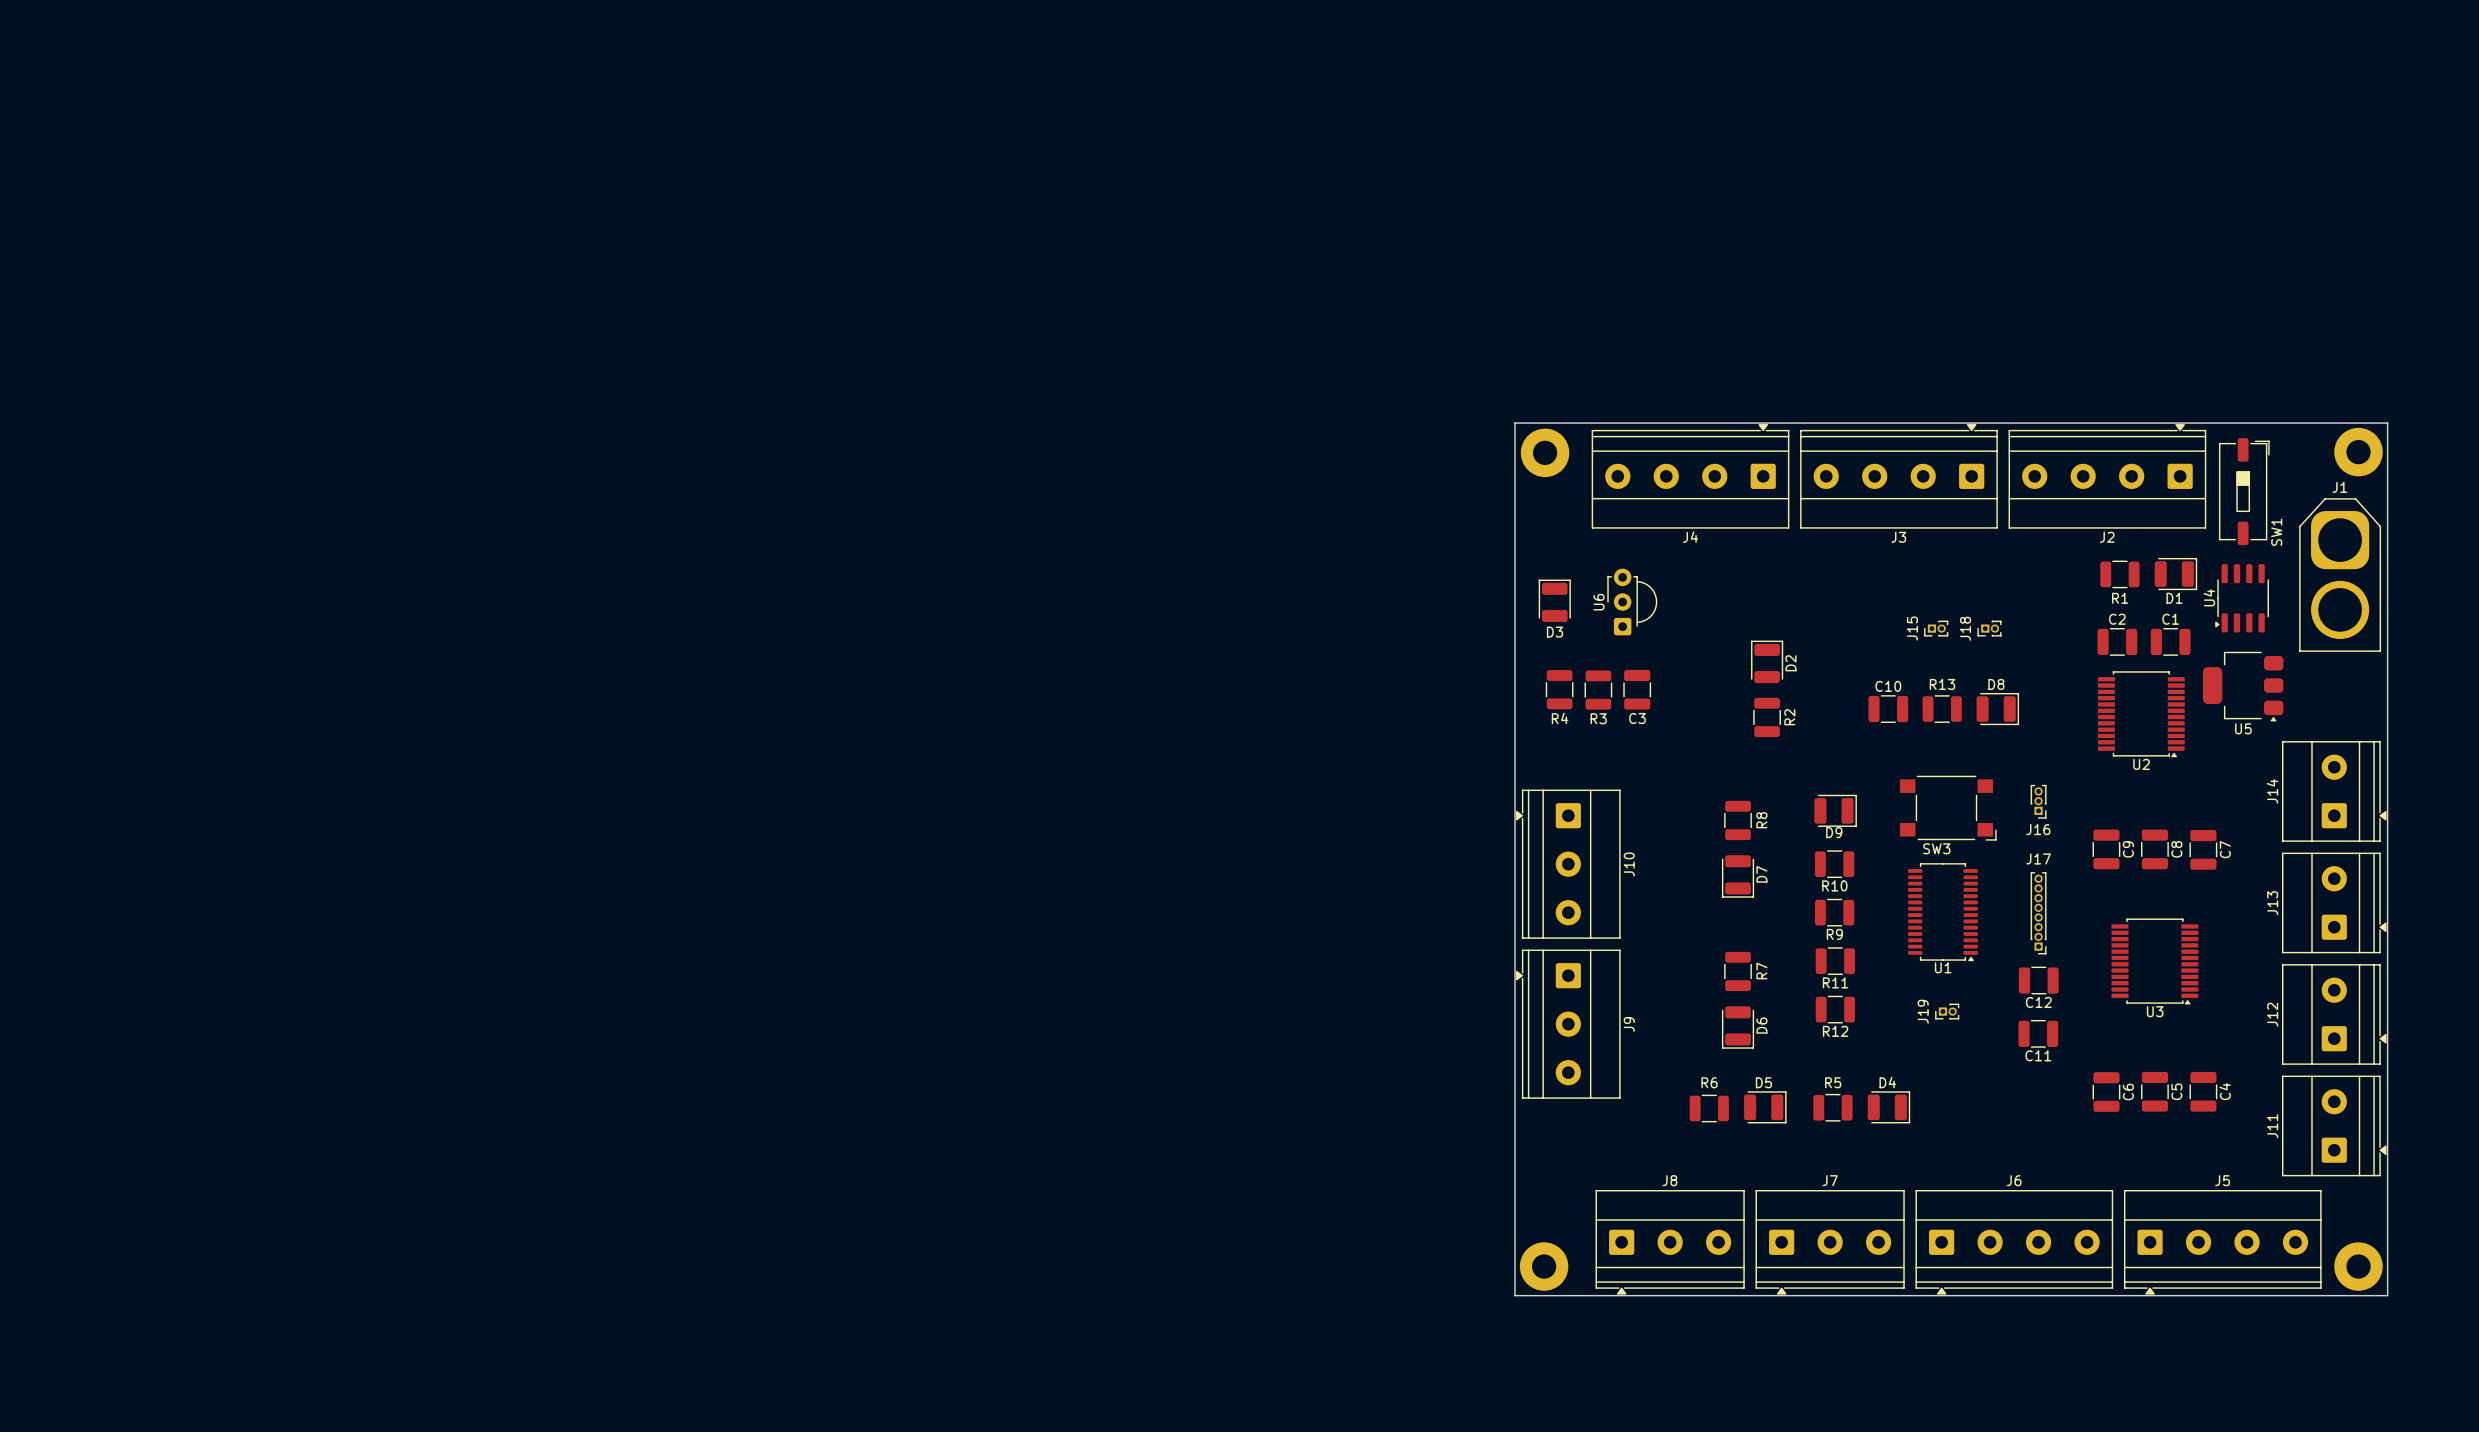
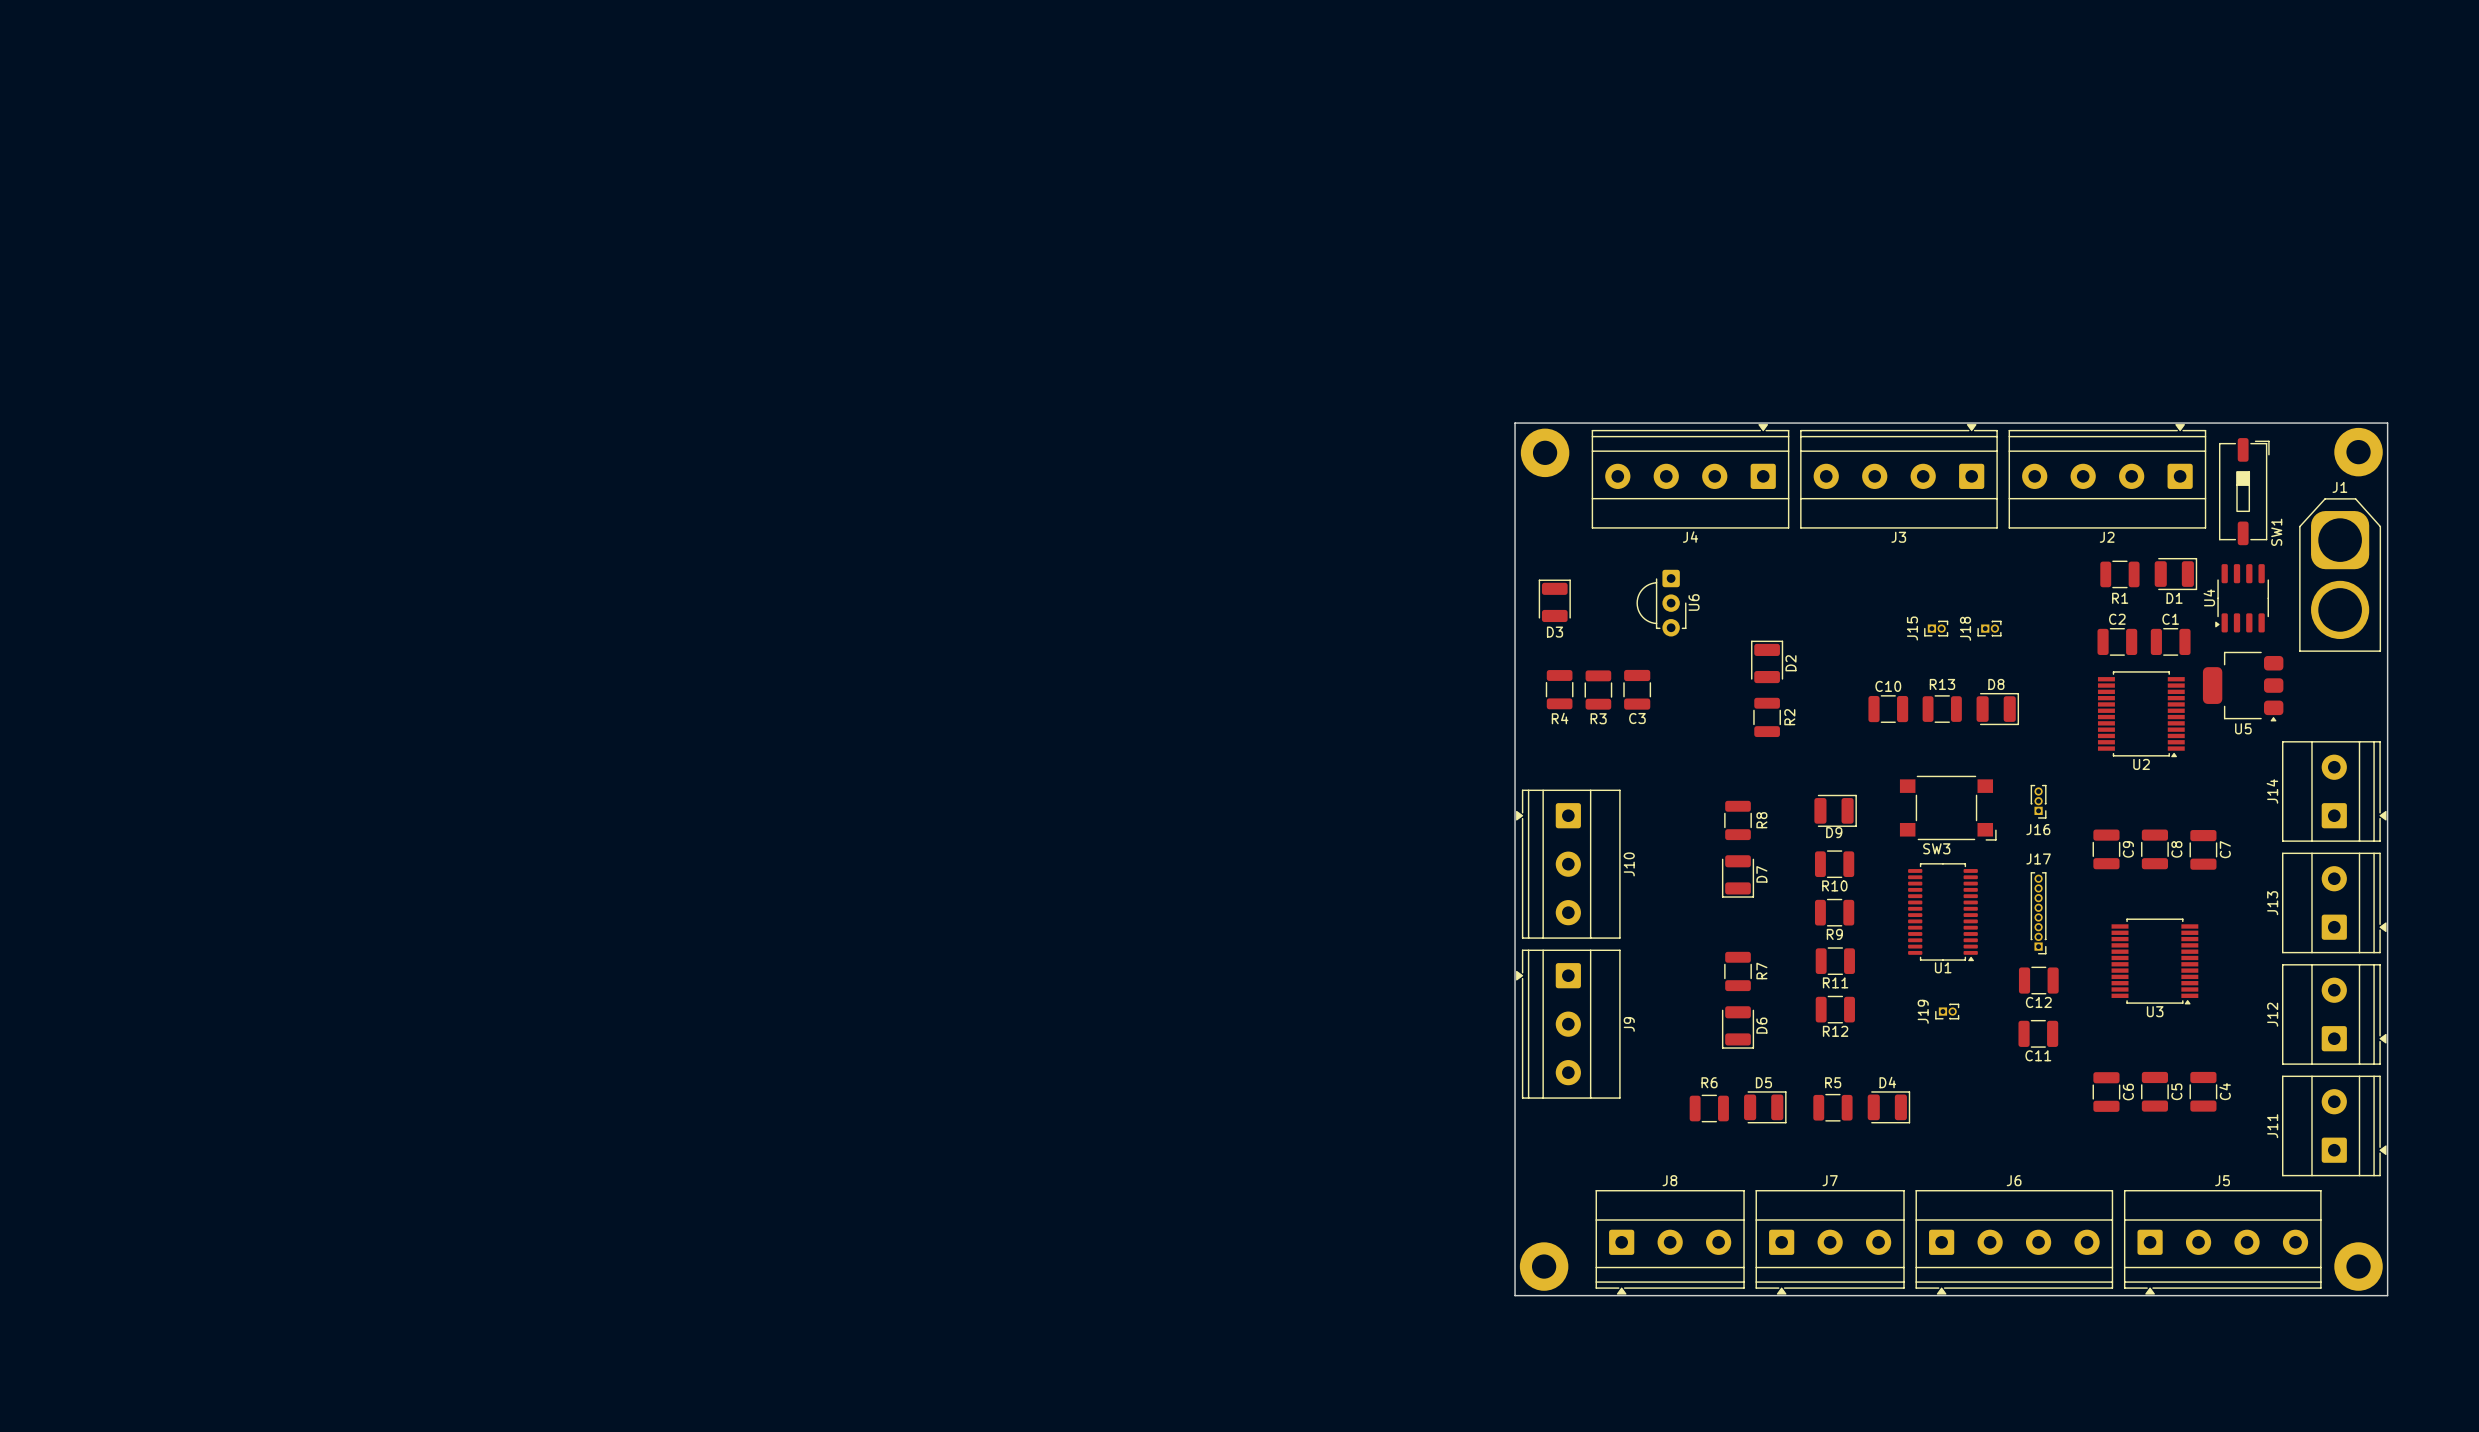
U6 rotation: 0° (1632, 602) -> 180° (1661, 603)

